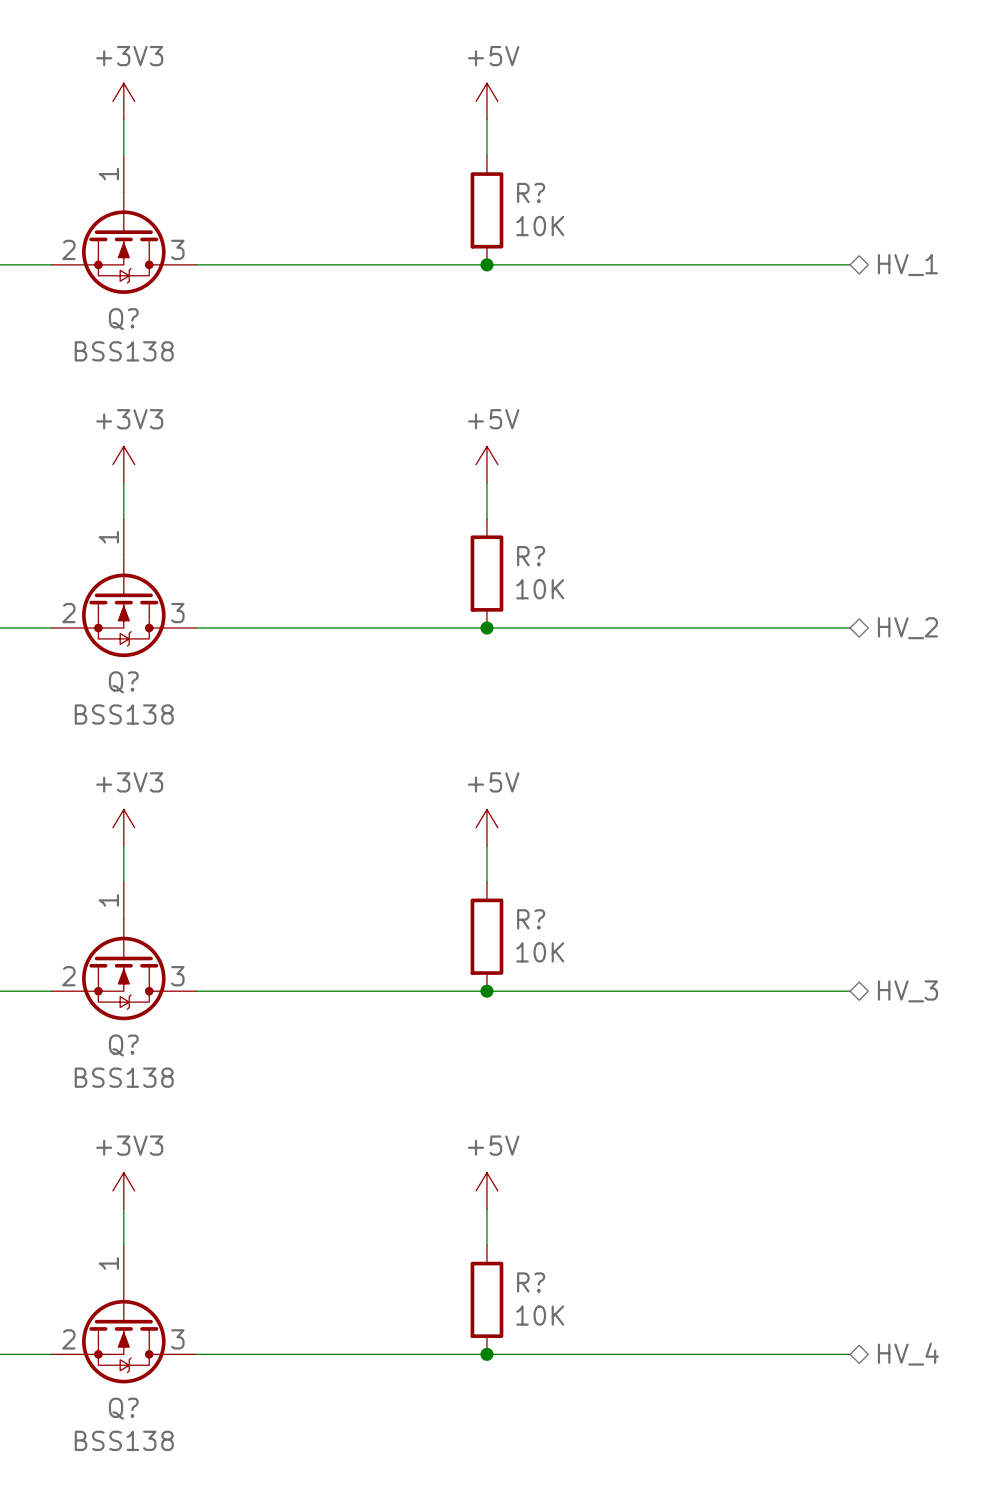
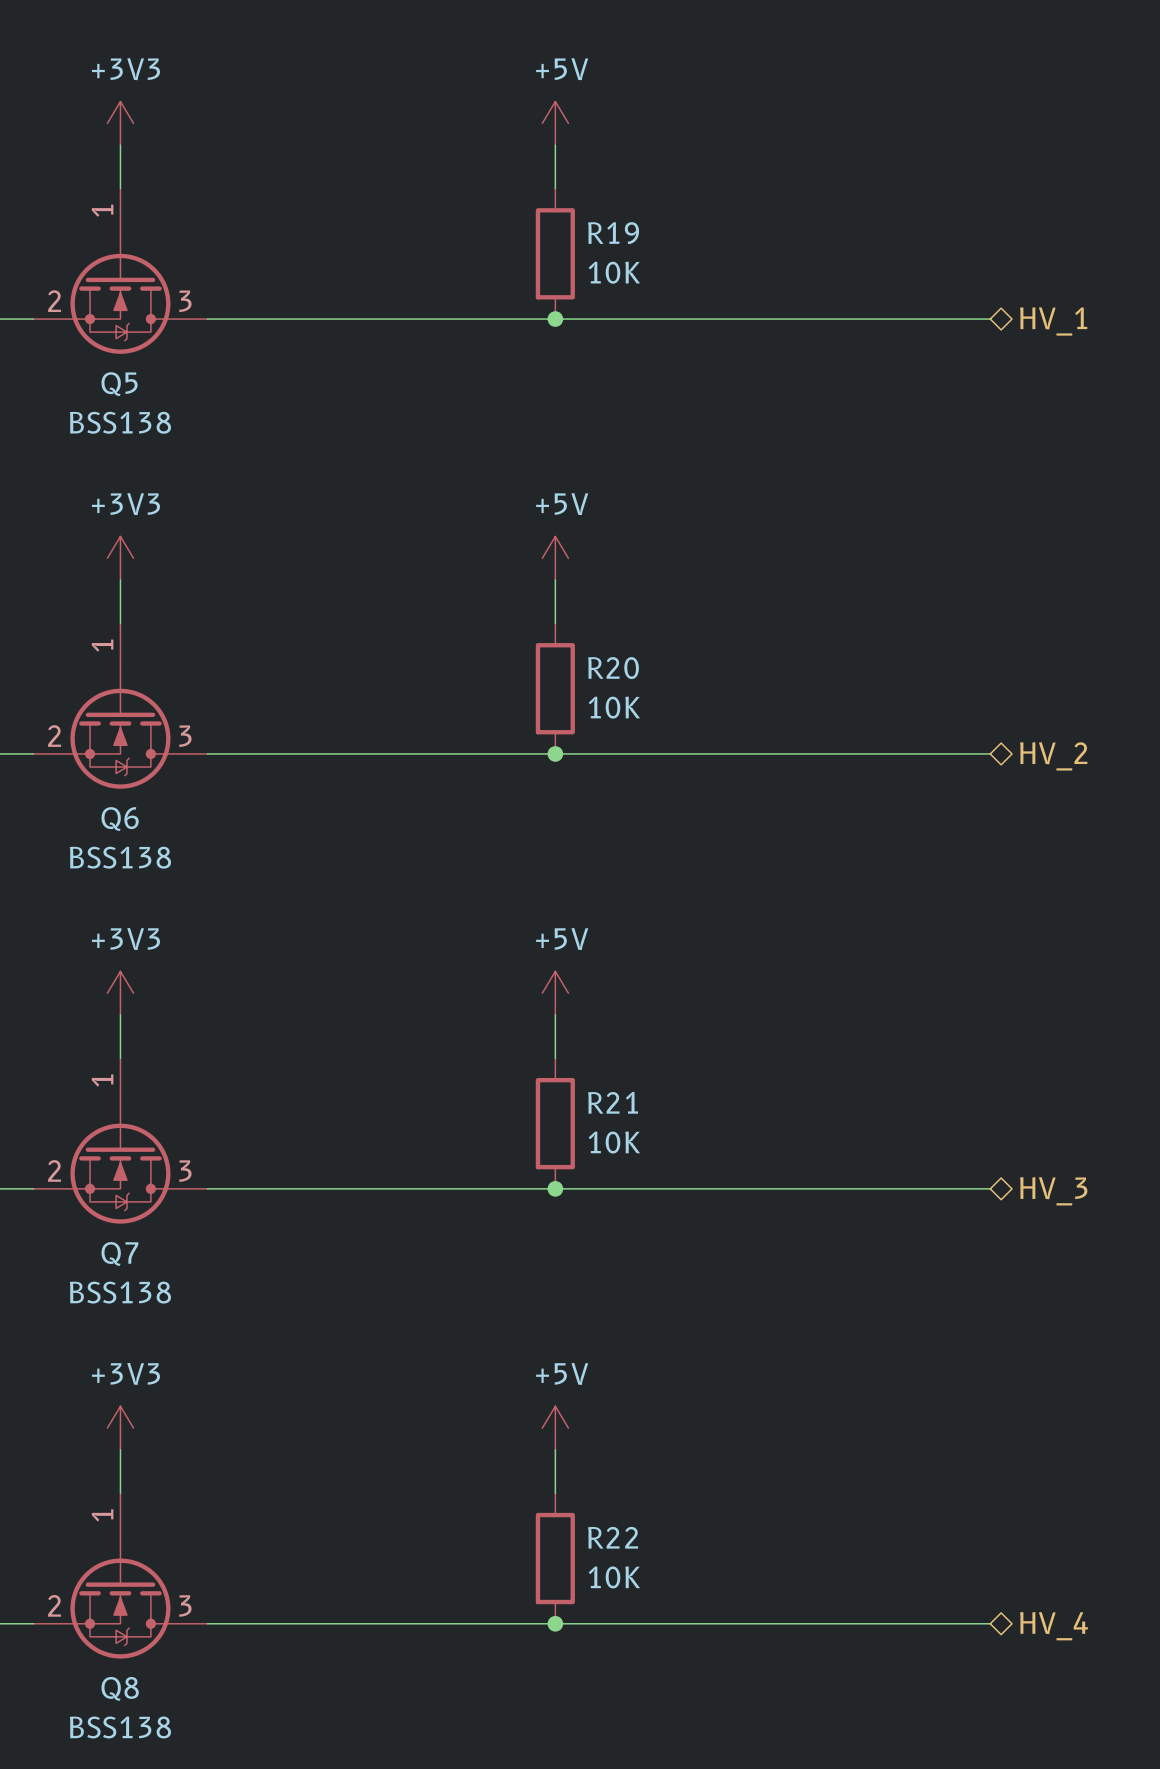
R? name: R? (531, 193) -> R19 (613, 233)
Q? name: Q? (123, 319) -> Q5 (119, 384)
R? name: R? (531, 556) -> R20 (613, 668)
Q? name: Q? (123, 682) -> Q6 (120, 819)
R? name: R? (531, 919) -> R21 (613, 1102)
Q? name: Q? (123, 1045) -> Q7 (119, 1253)
R? name: R? (531, 1282) -> R22 (613, 1537)
Q? name: Q? (123, 1408) -> Q8 (120, 1688)

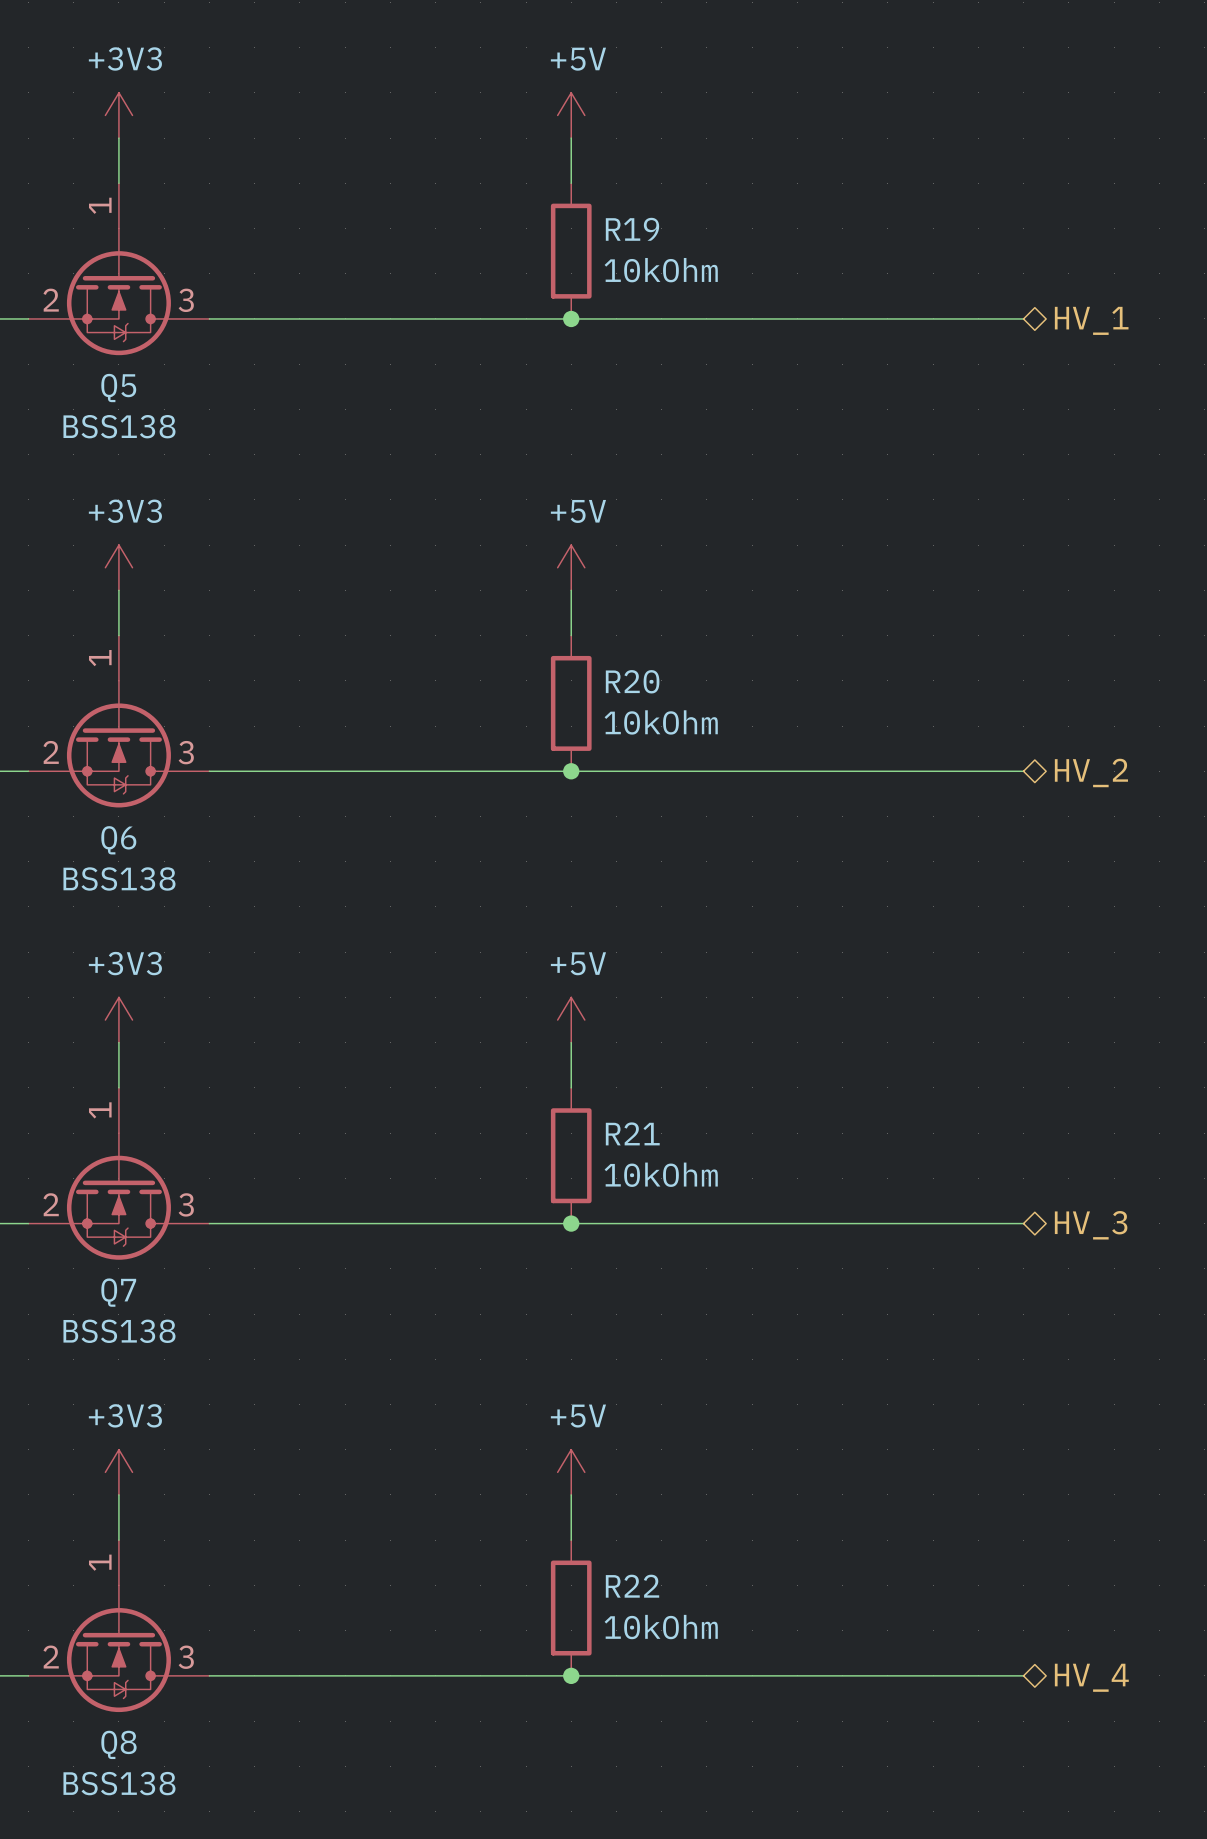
R19 value: 10K (614, 272) -> 10kOhm (661, 270)
R20 value: 10K (614, 707) -> 10kOhm (661, 722)
R21 value: 10K (614, 1142) -> 10kOhm (661, 1174)
R22 value: 10K (614, 1577) -> 10kOhm (661, 1627)

